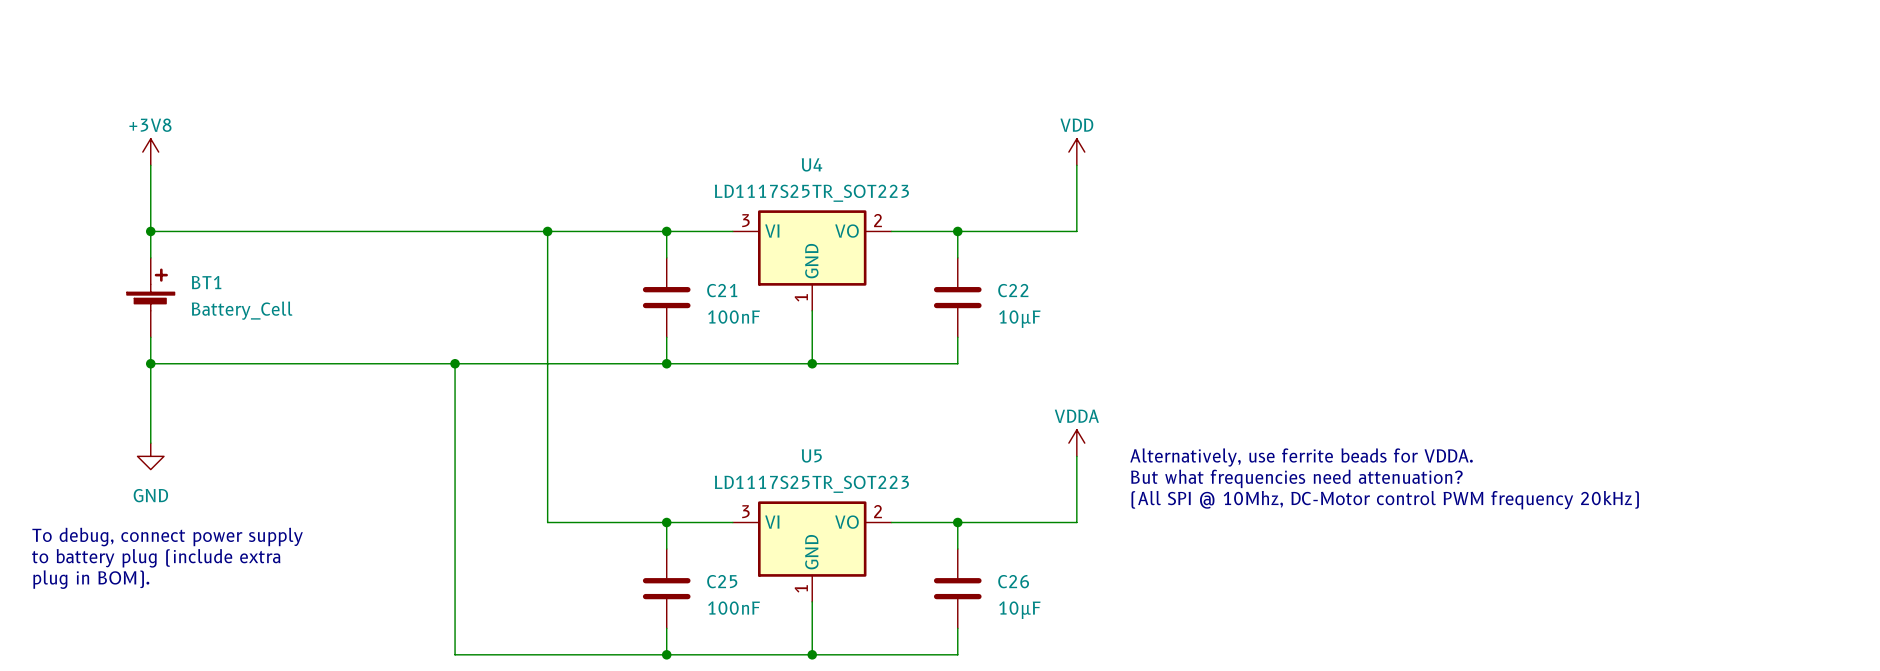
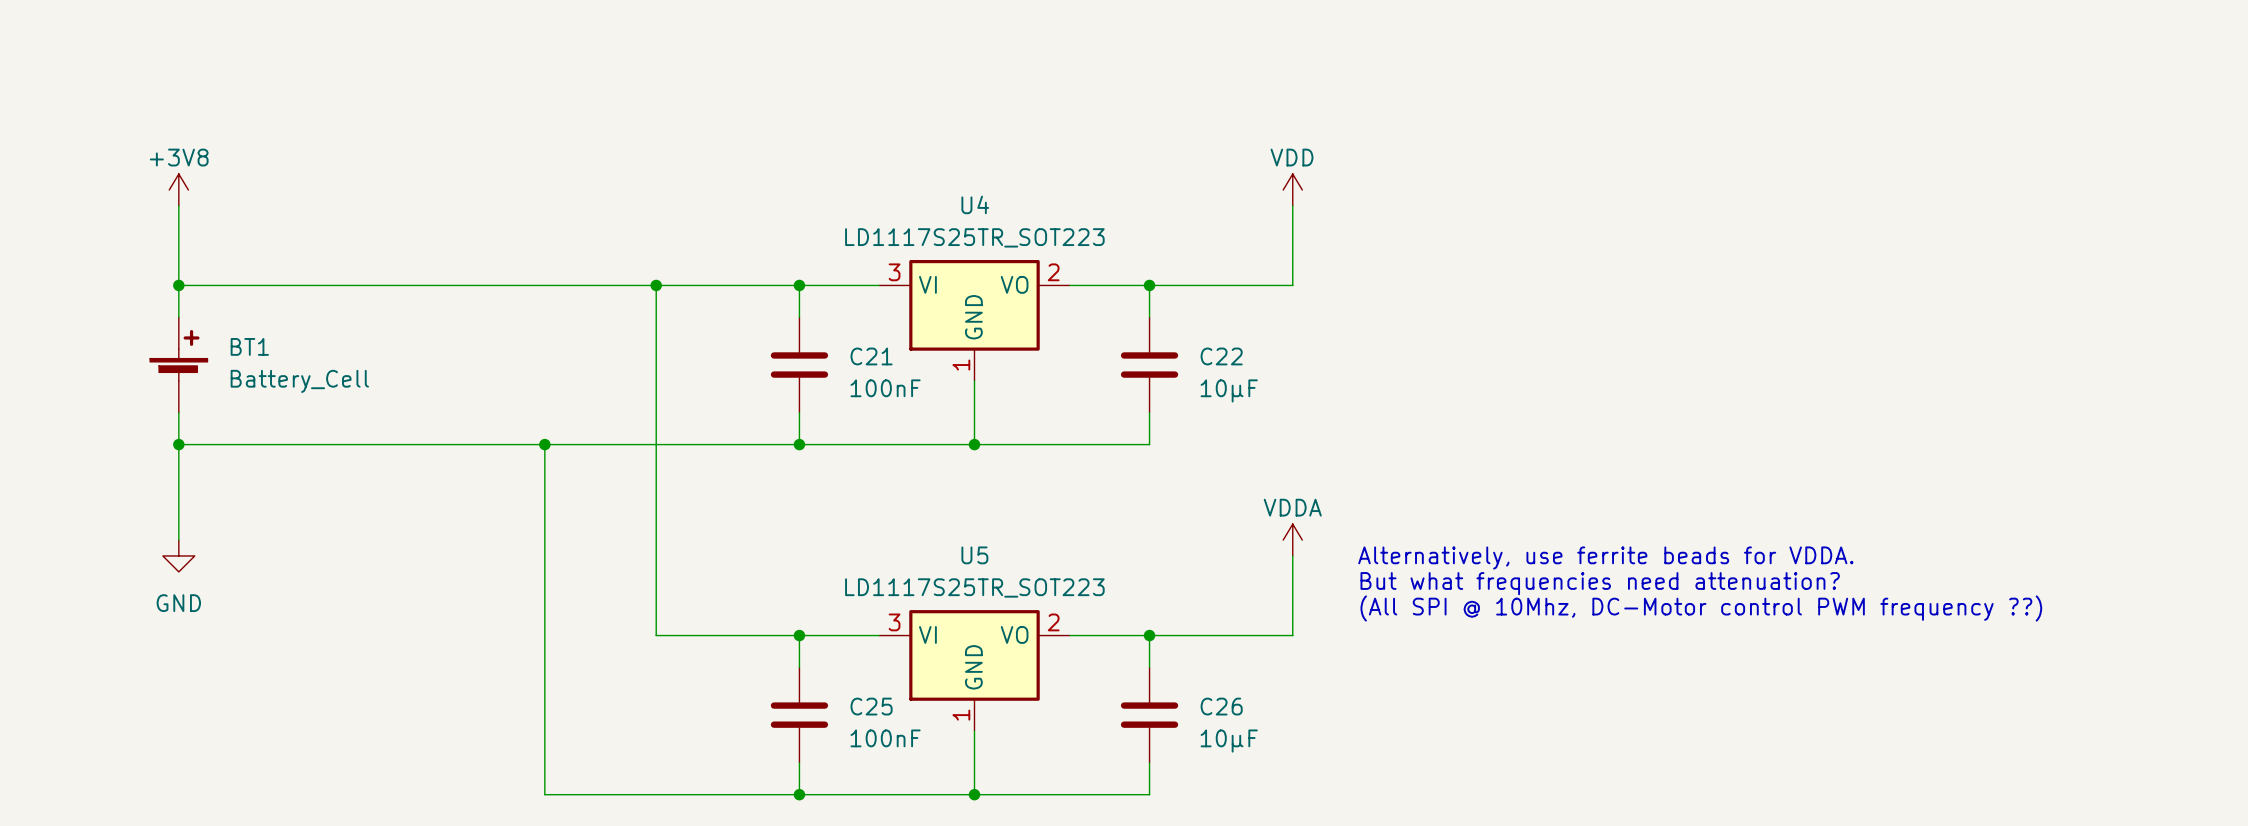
text: (All SPI @ 10Mhz, DC-Motor control PWM frequency 20kHz) (1385, 500) -> (All SPI @ 10Mhz, DC-Motor control PWM frequency ??) (1701, 608)
text: To debug, connect power supply (167, 537) -> none
text: to battery plug (include extra (156, 558) -> none
text: plug in BOM). (91, 579) -> none

